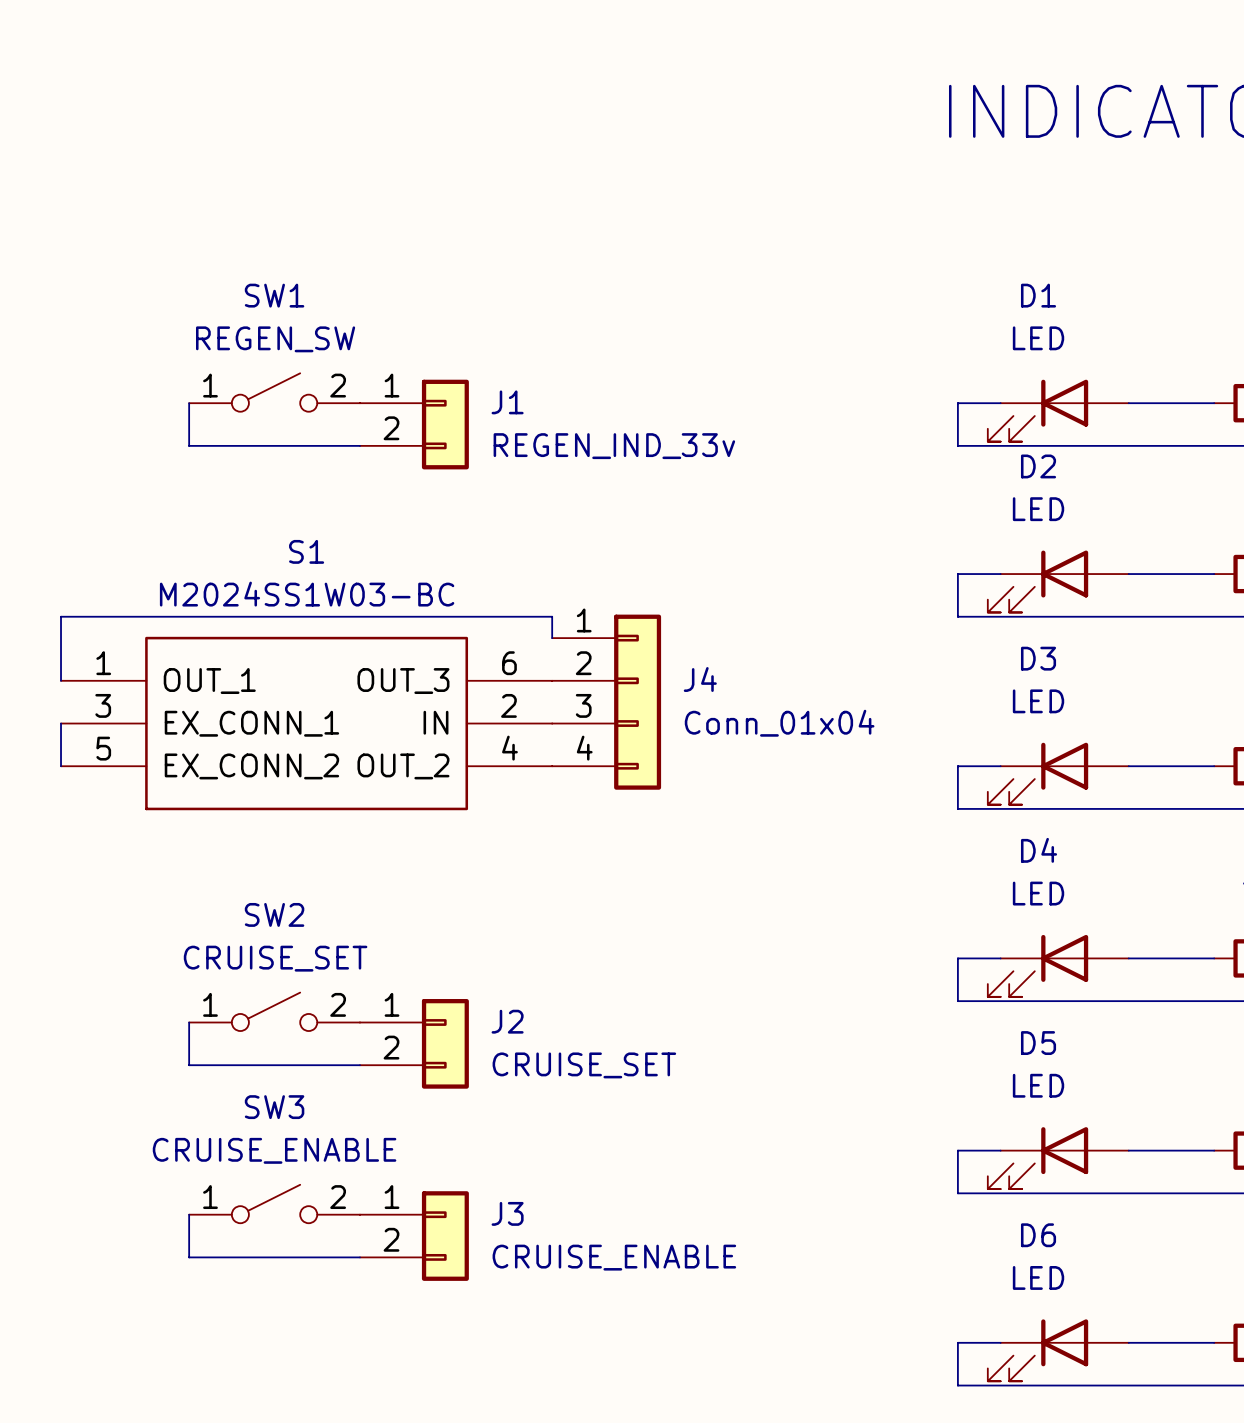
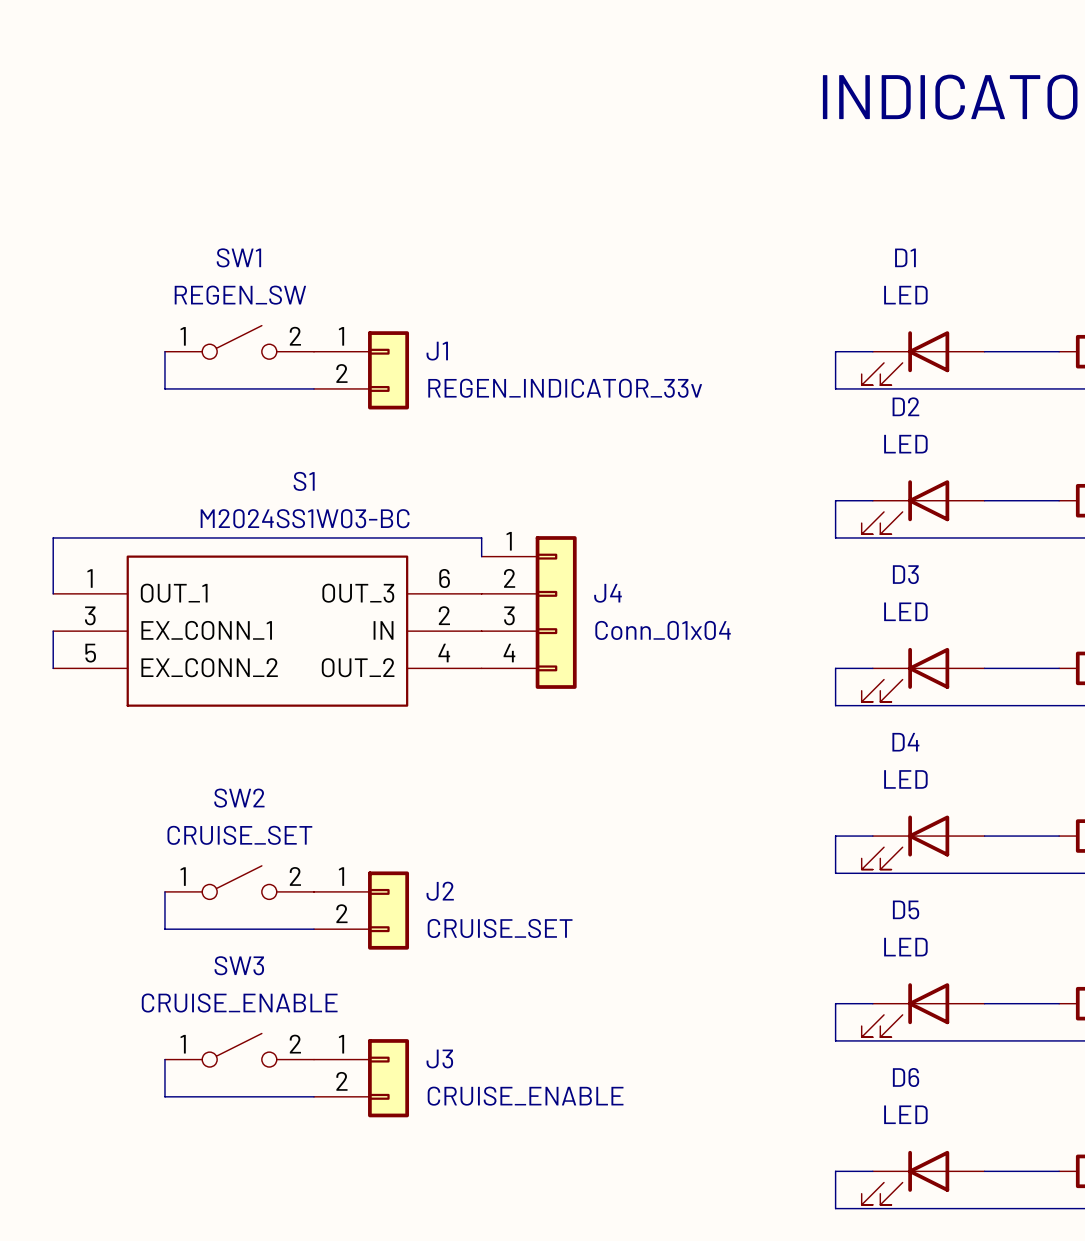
J1 value: REGEN_IND_33v (614, 446) -> REGEN_INDICATOR_33v (565, 388)
S1 name position: S1 (306, 551) -> S1 (304, 481)
S1 value position: M2024SS1W03-BC (307, 594) -> M2024SS1W03-BC (305, 518)

